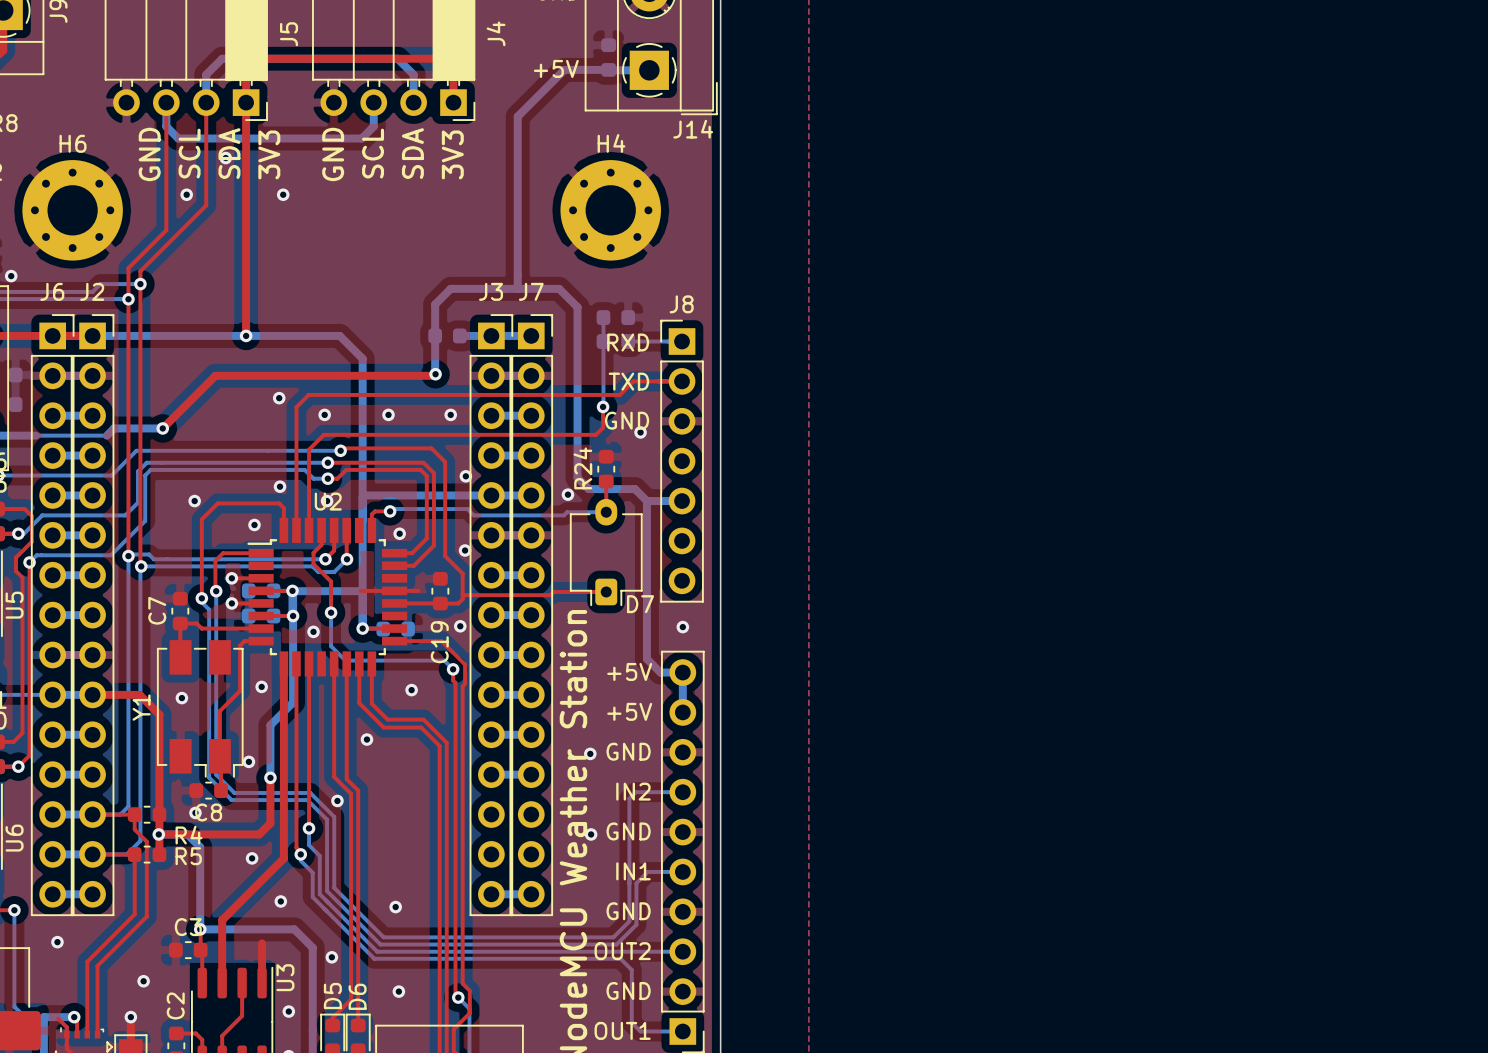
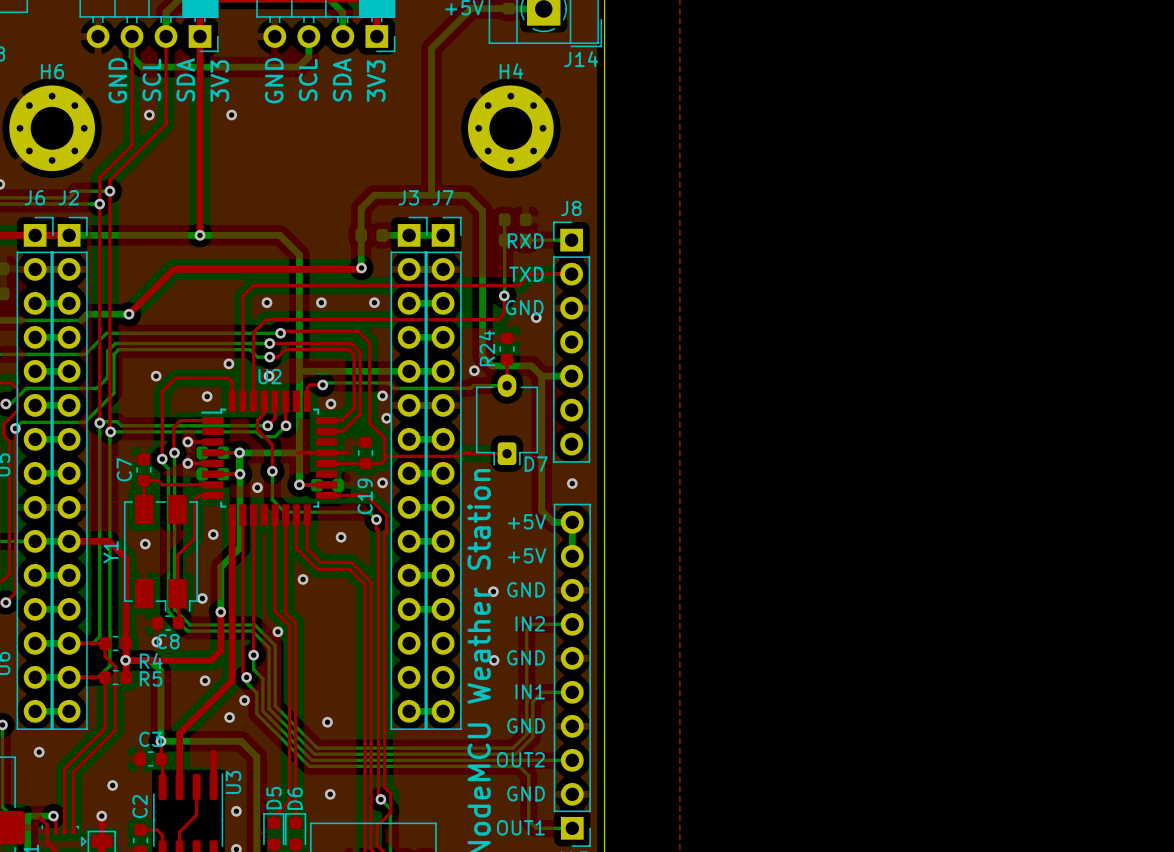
via: (225, 158) -> none
via: (279, 398) -> none
via position: (465, 476) -> (382, 395)
via position: (331, 957) -> (244, 700)

